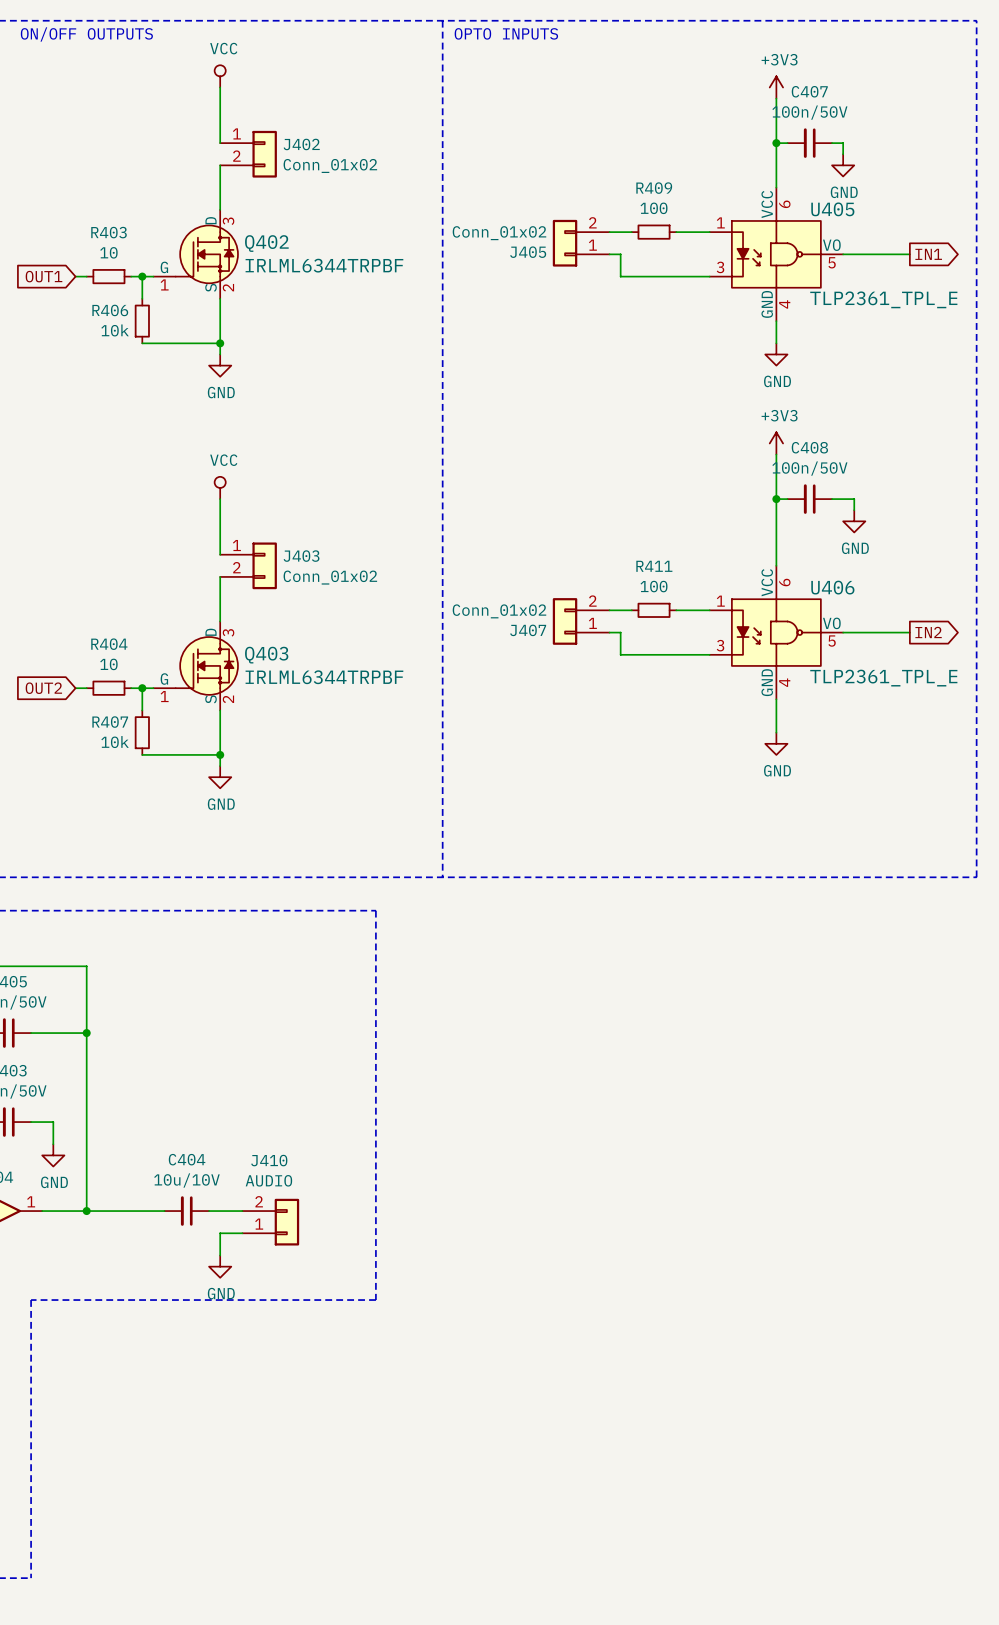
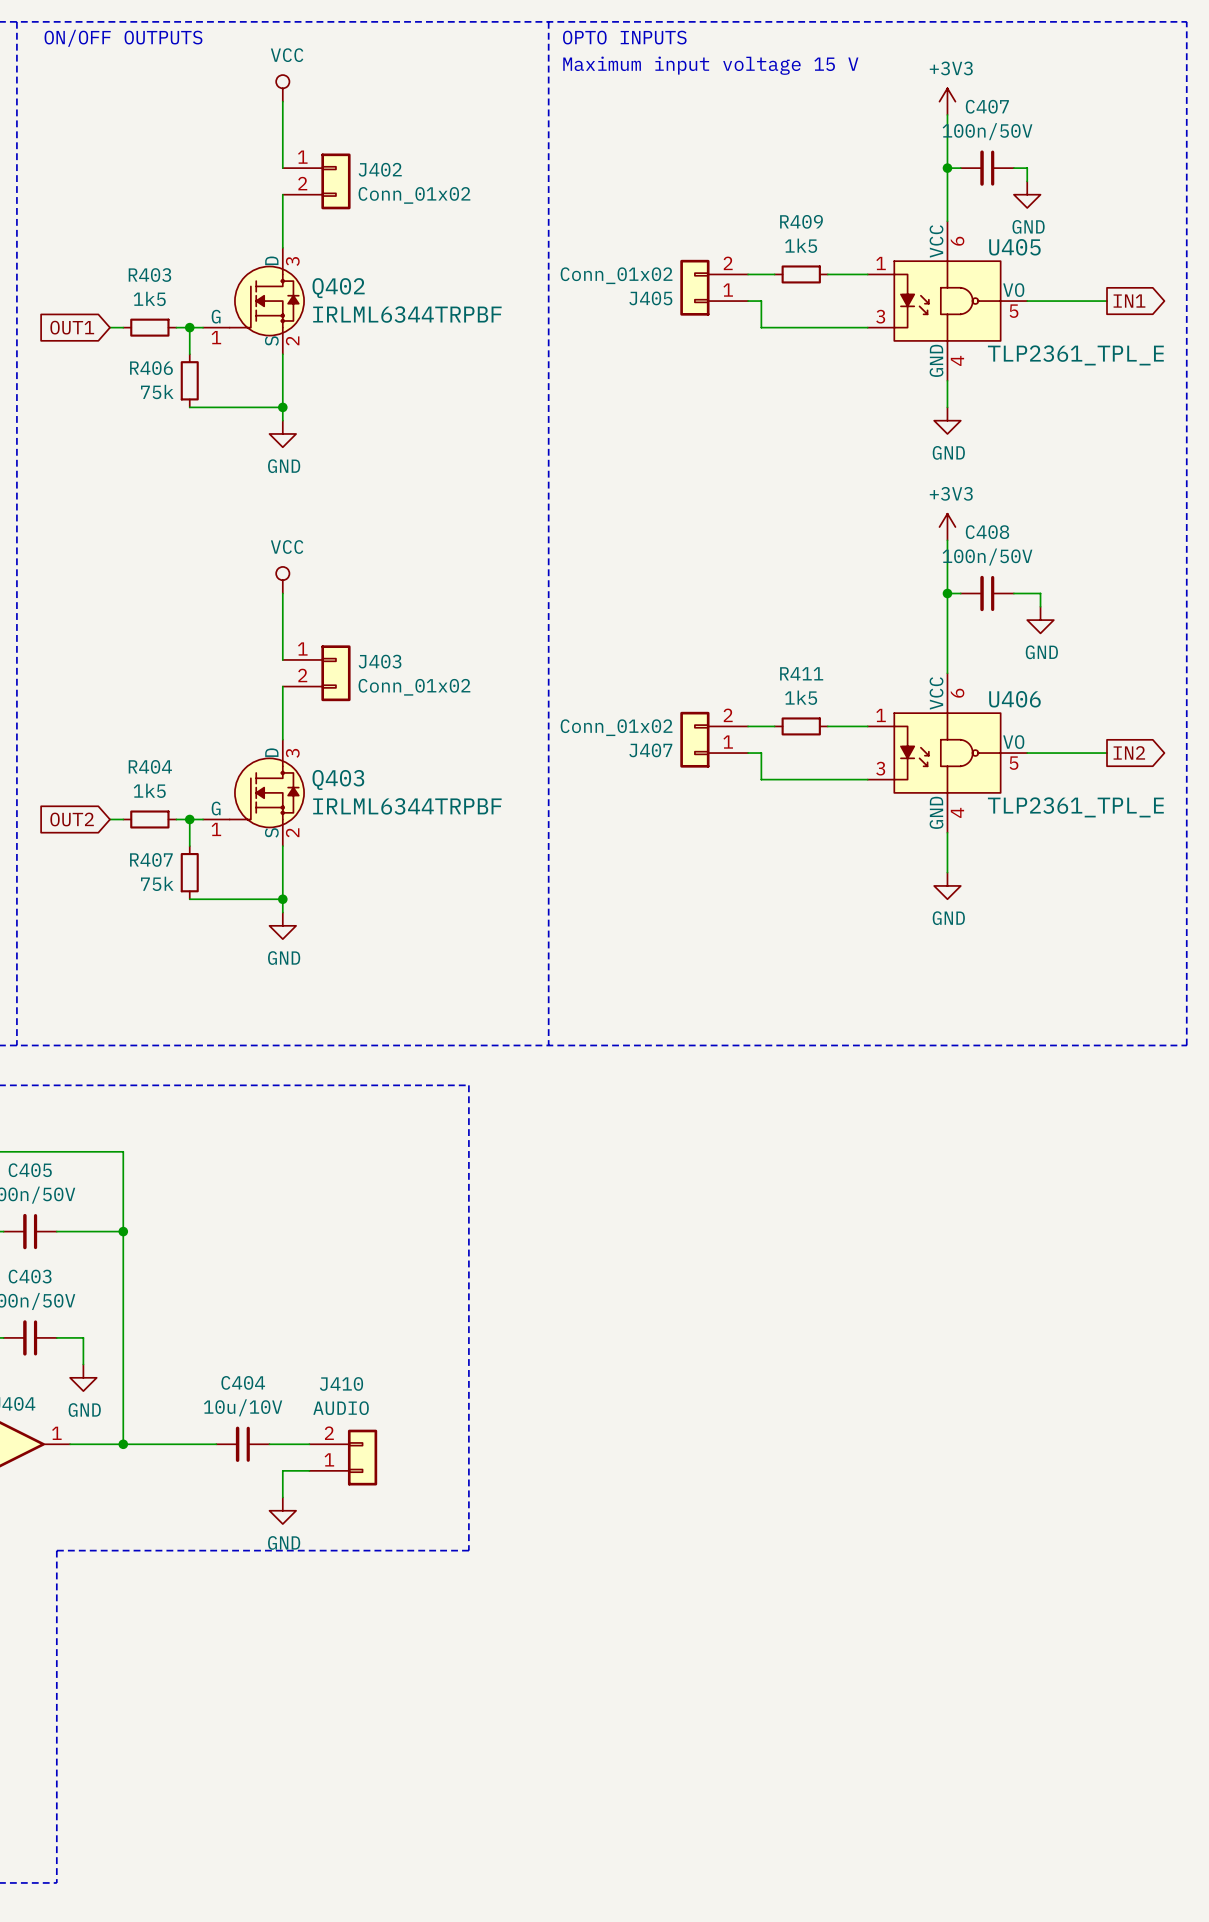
text: none -> Maximum input voltage 15 V (710, 65)
R409 value: 100 (654, 208) -> 1k5 (801, 245)
R403 value: 10 (108, 252) -> 1k5 (149, 298)
R406 value: 10k (115, 330) -> 75k (157, 391)
R411 value: 100 (654, 586) -> 1k5 (801, 697)
R404 value: 10 (108, 664) -> 1k5 (149, 790)
R407 value: 10k (115, 742) -> 75k (157, 883)

